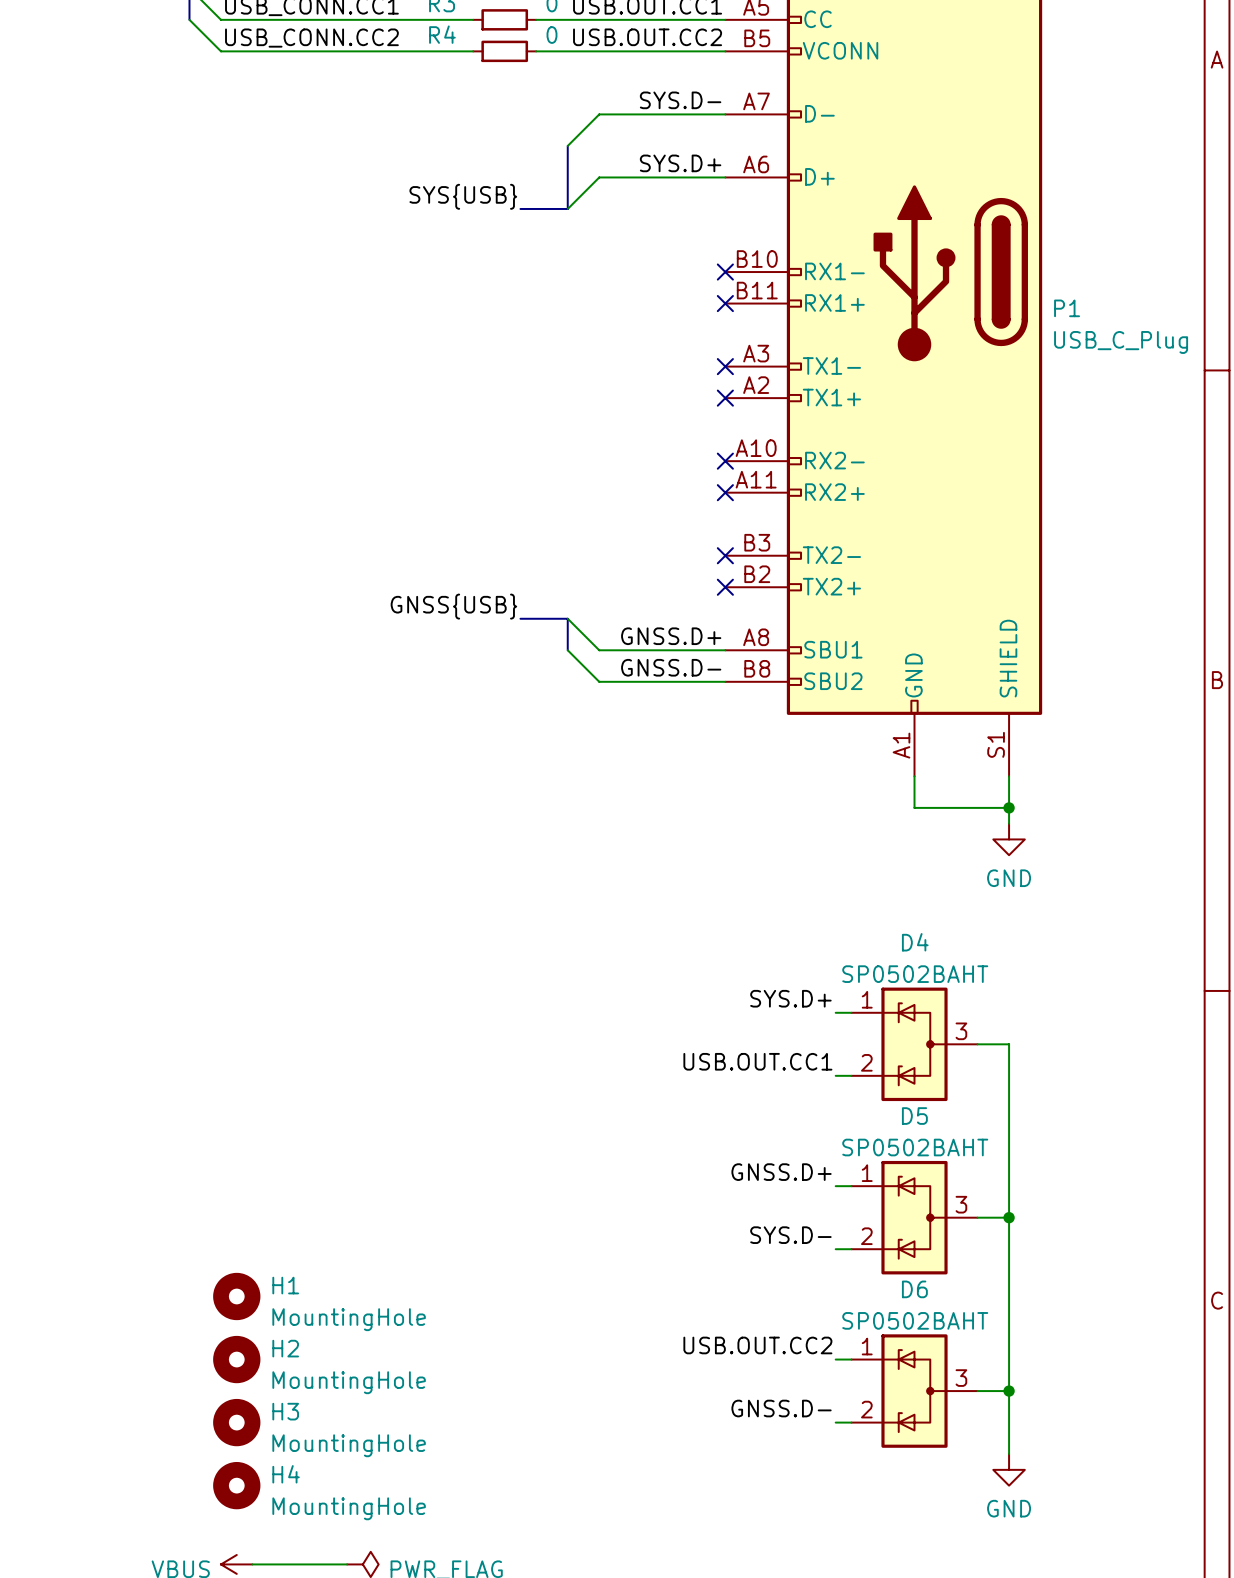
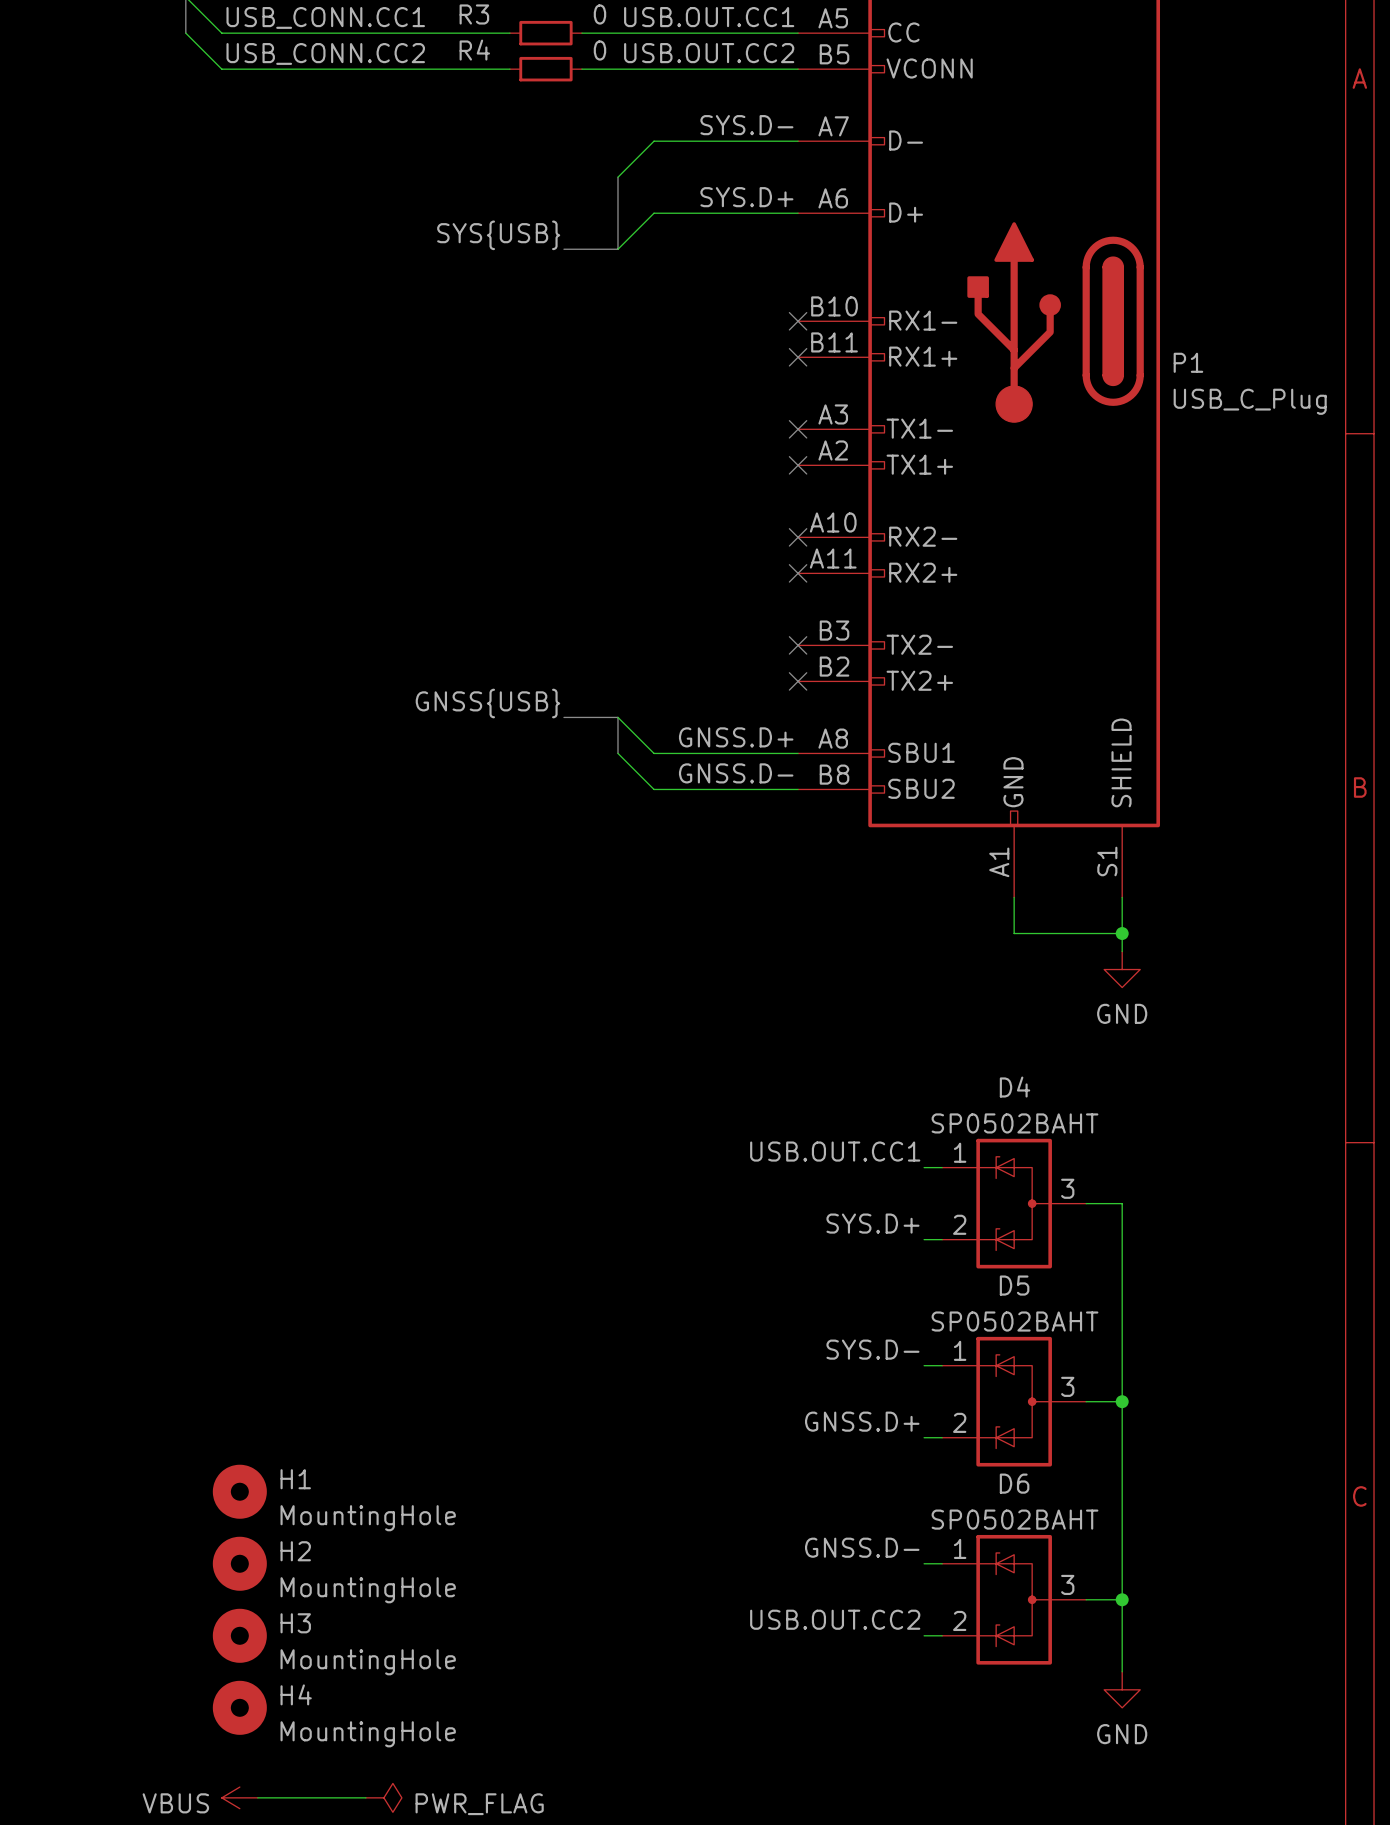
label: SYS.D+ (790, 998) -> USB.OUT.CC1 (835, 1151)
label: USB.OUT.CC1 (757, 1061) -> SYS.D+ (872, 1223)
label: GNSS.D+ (781, 1172) -> SYS.D- (872, 1349)
label: SYS.D- (790, 1235) -> GNSS.D+ (862, 1421)
label: USB.OUT.CC2 (757, 1345) -> GNSS.D- (862, 1547)
label: GNSS.D- (781, 1408) -> USB.OUT.CC2 (835, 1619)

